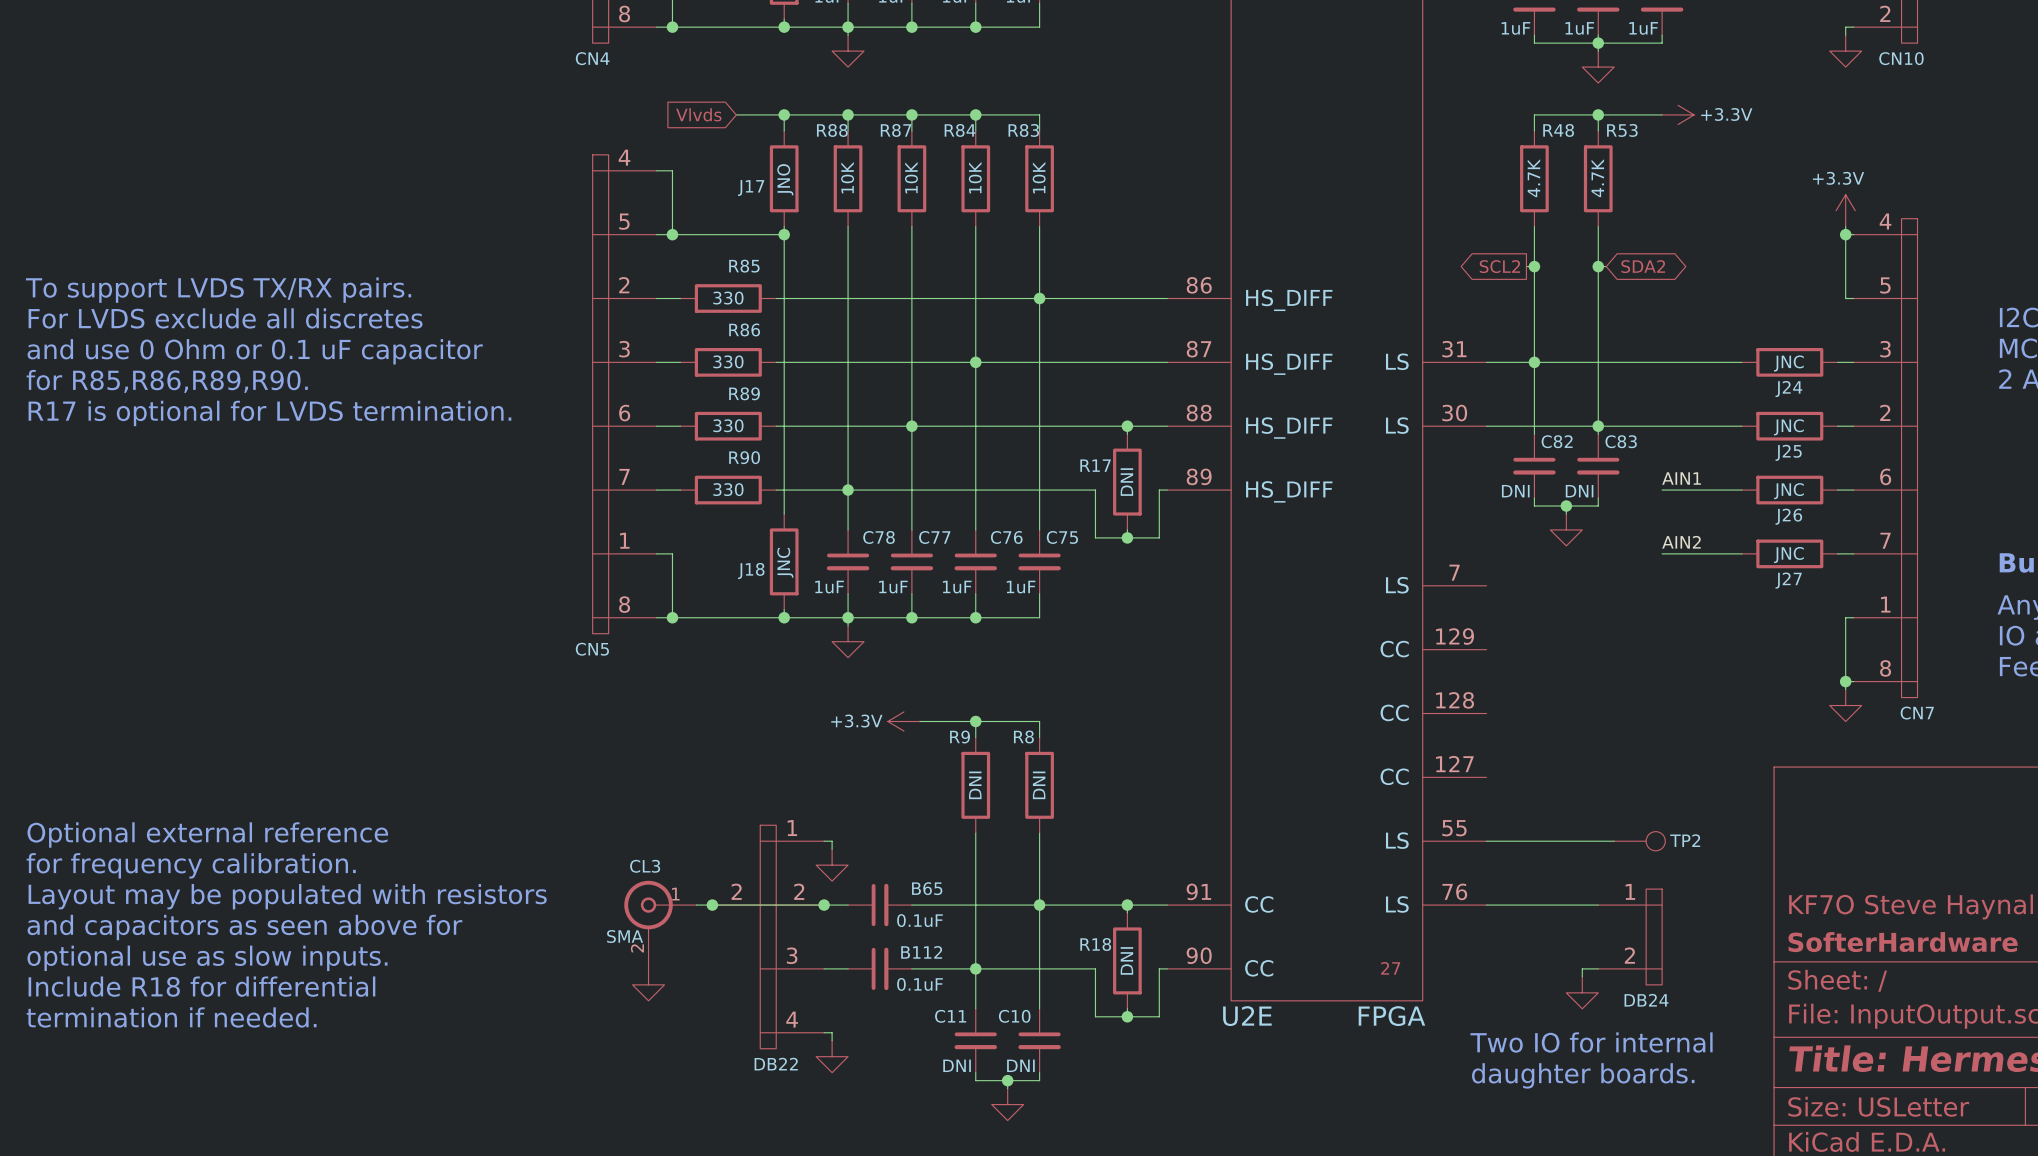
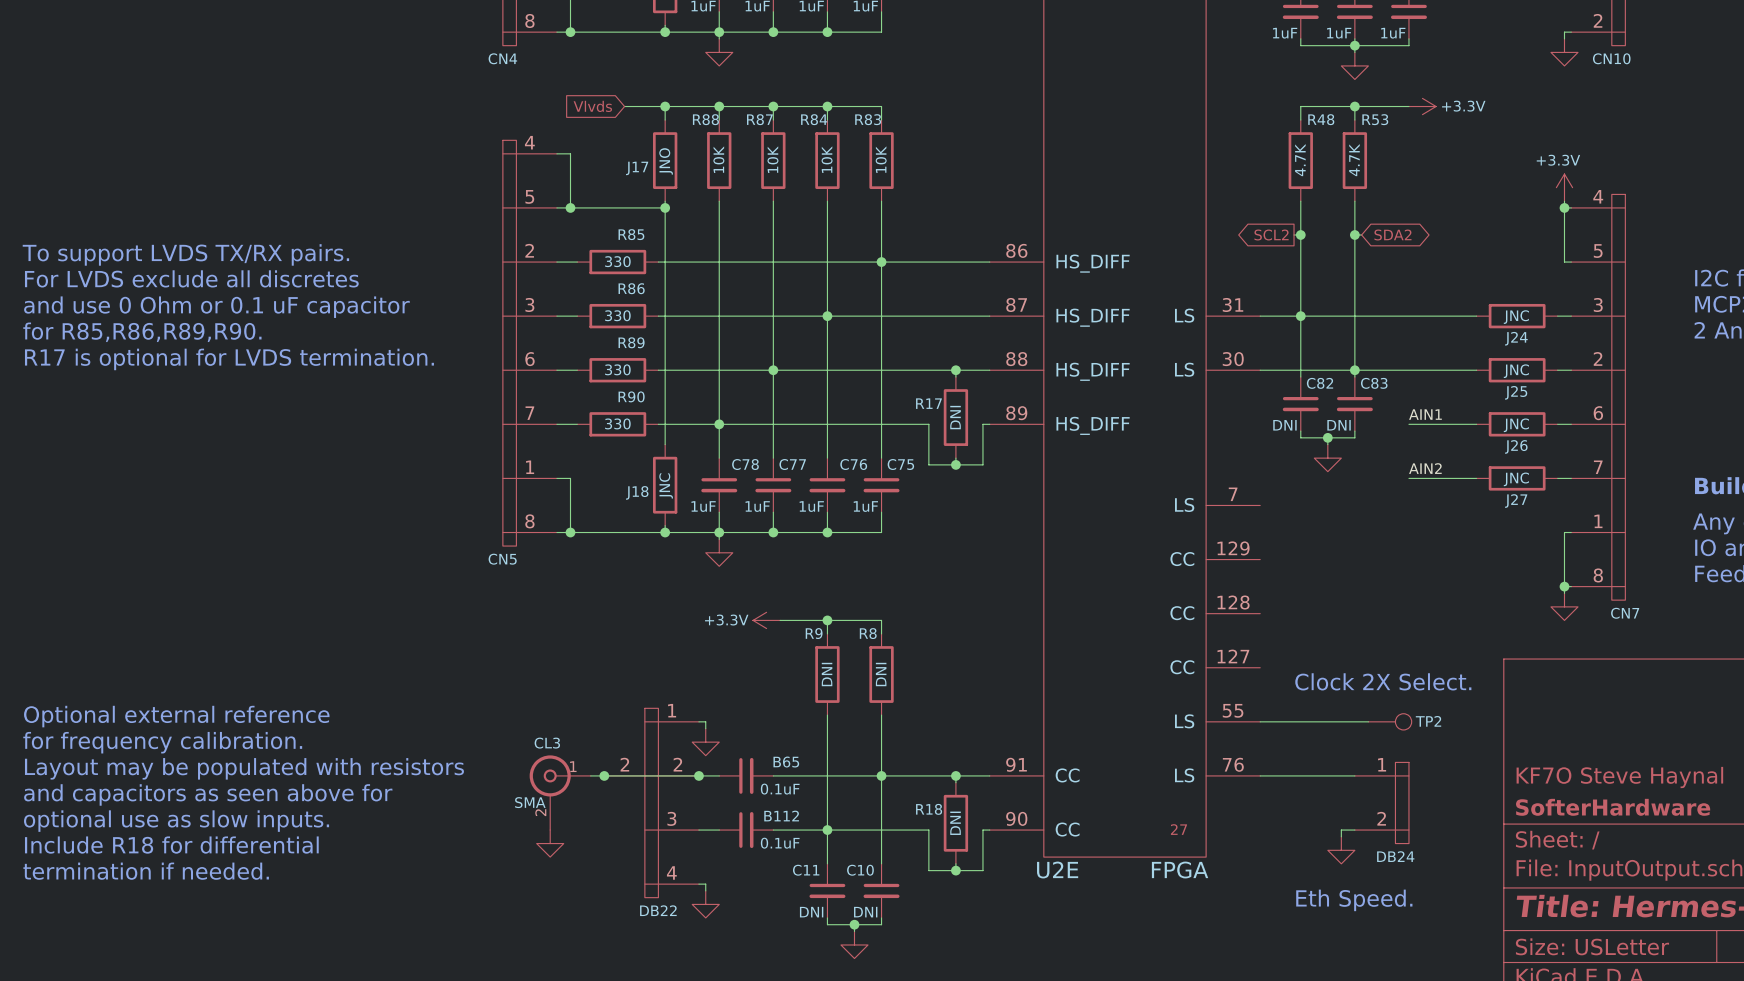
text: none -> Clock 2X Select. (1383, 681)
text: Two IO for internal (1591, 1042) -> none
text: none -> Eth Speed. (1354, 900)
text: daughter boards. (1583, 1075) -> none

